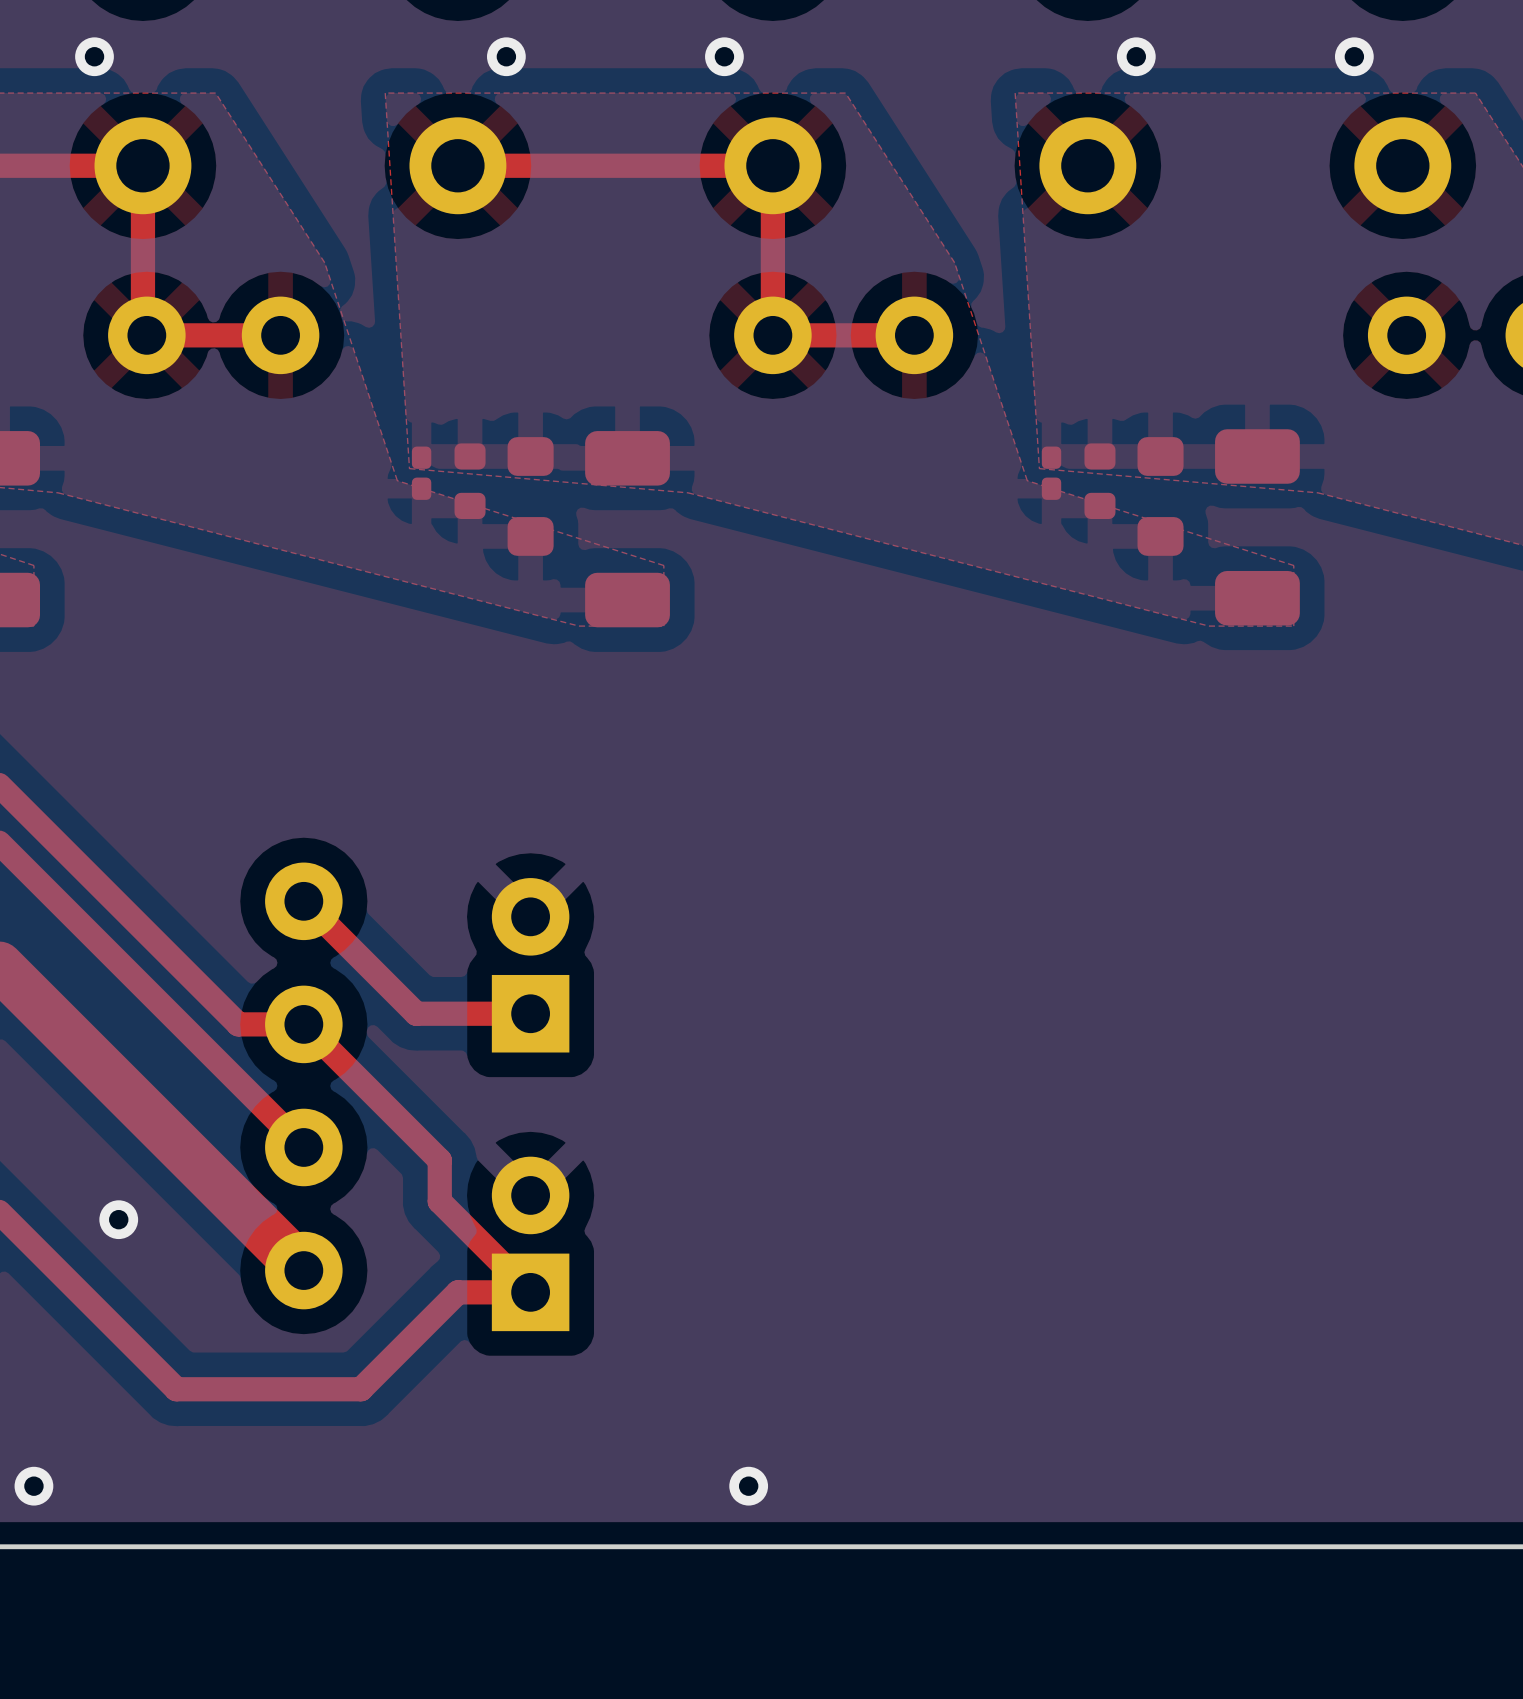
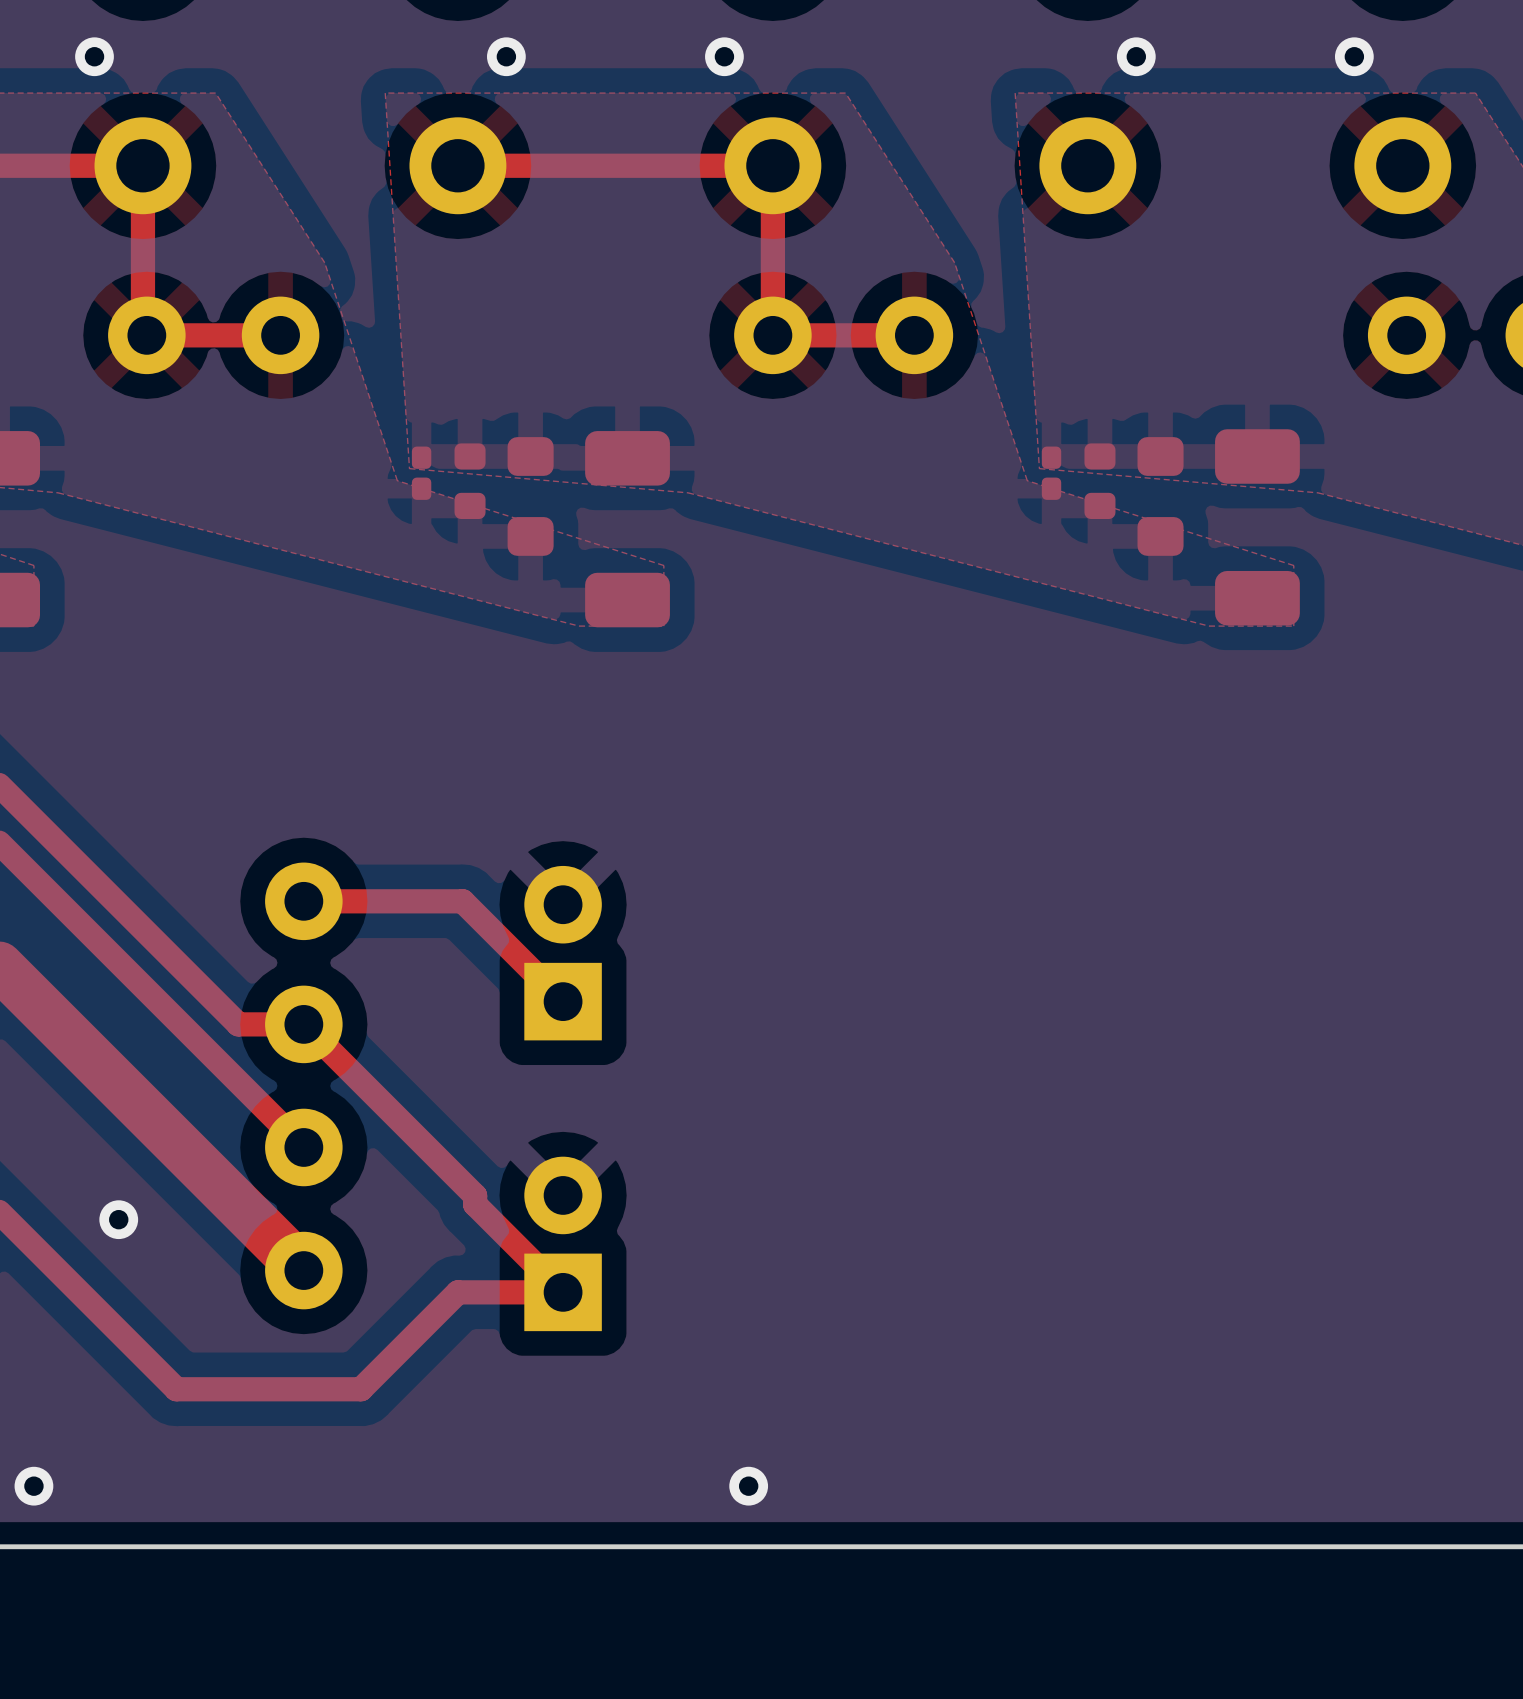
top track: (303, 901) (416, 1013) (530, 1013) -> (303, 901) (462, 901) (563, 1001)
part position: (530, 965) -> (563, 953)
top track: (439, 1160) (439, 1201) (530, 1292) -> (439, 1160) (475, 1195) (475, 1204) (563, 1292) (530, 1292)
part position: (530, 1243) -> (563, 1243)

